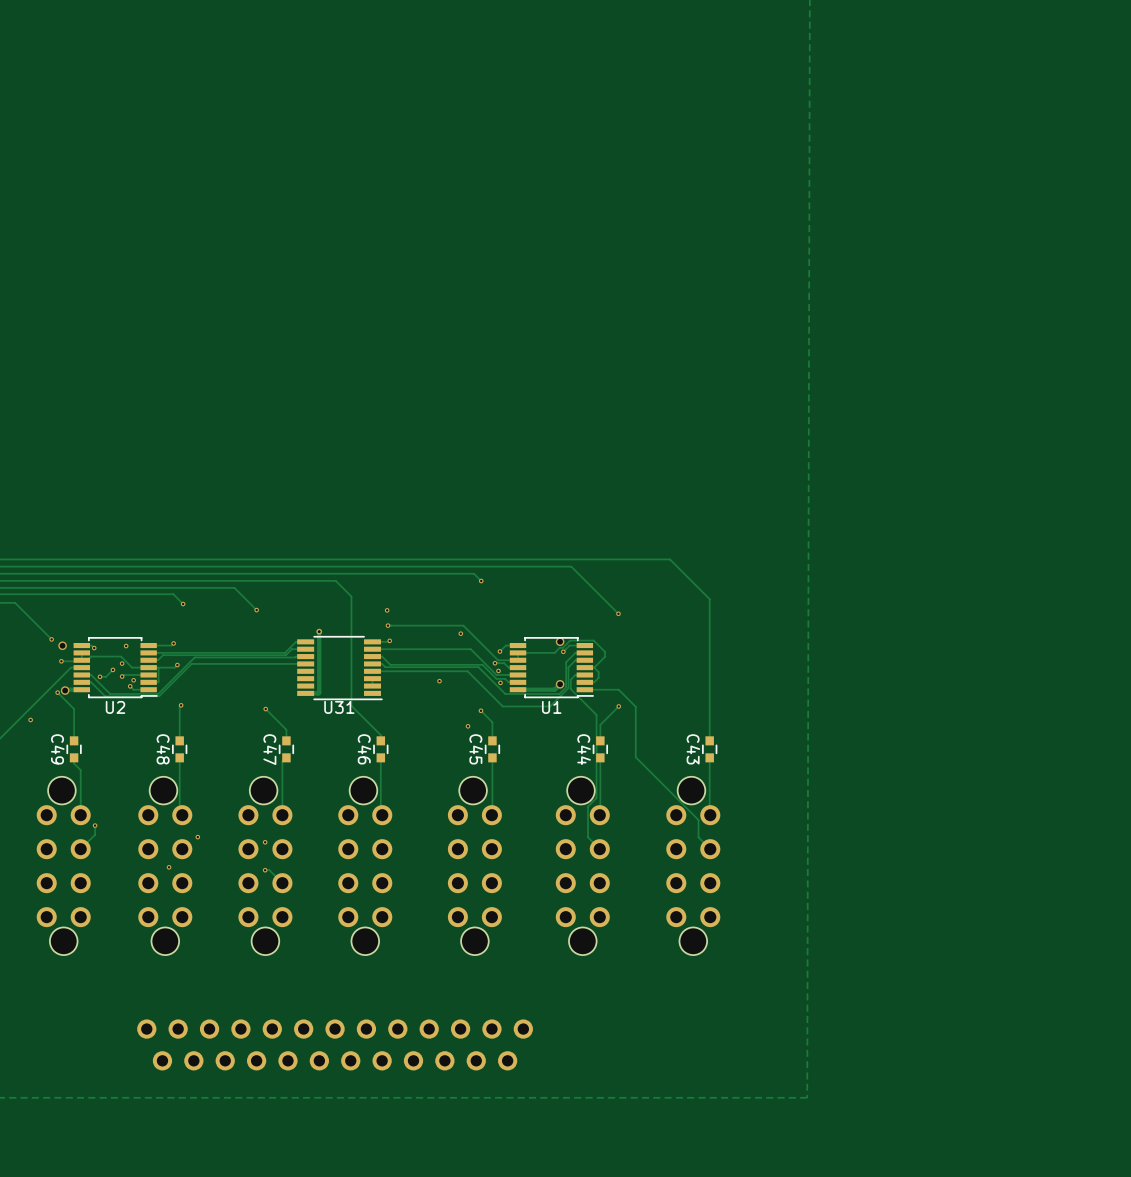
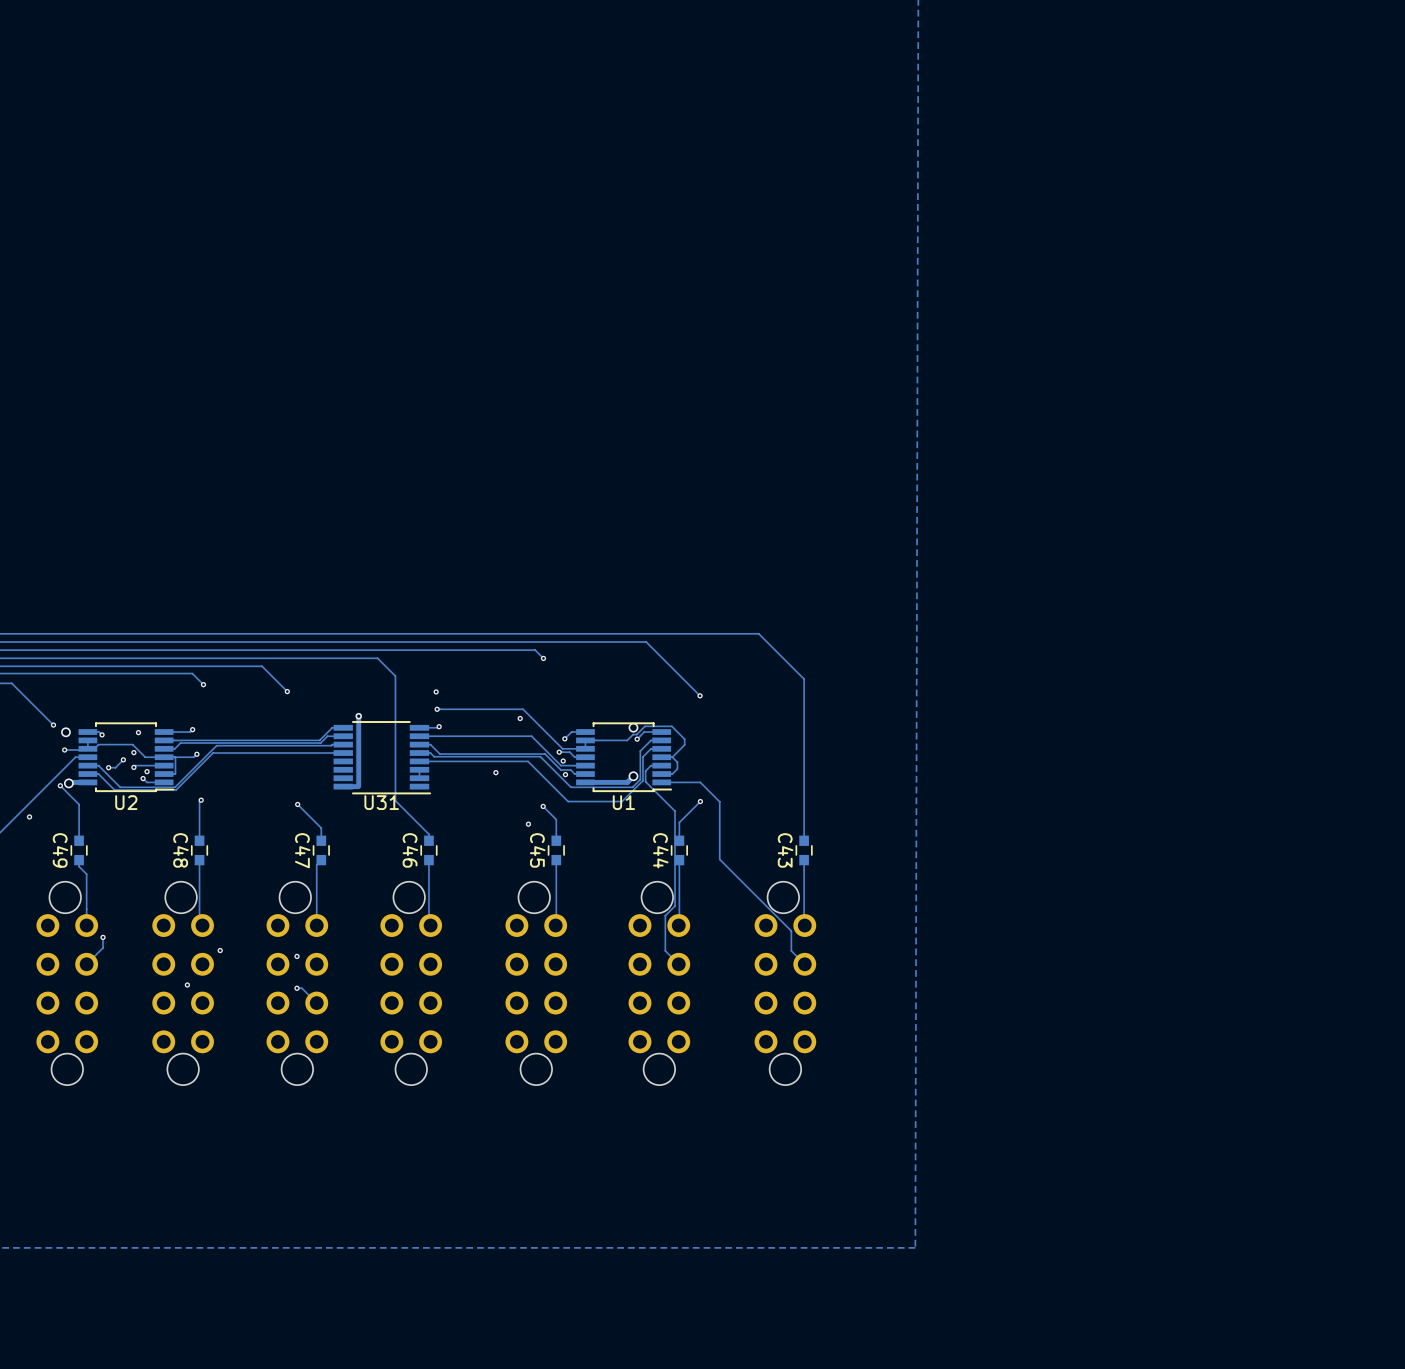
part: (335, 1044) -> none

